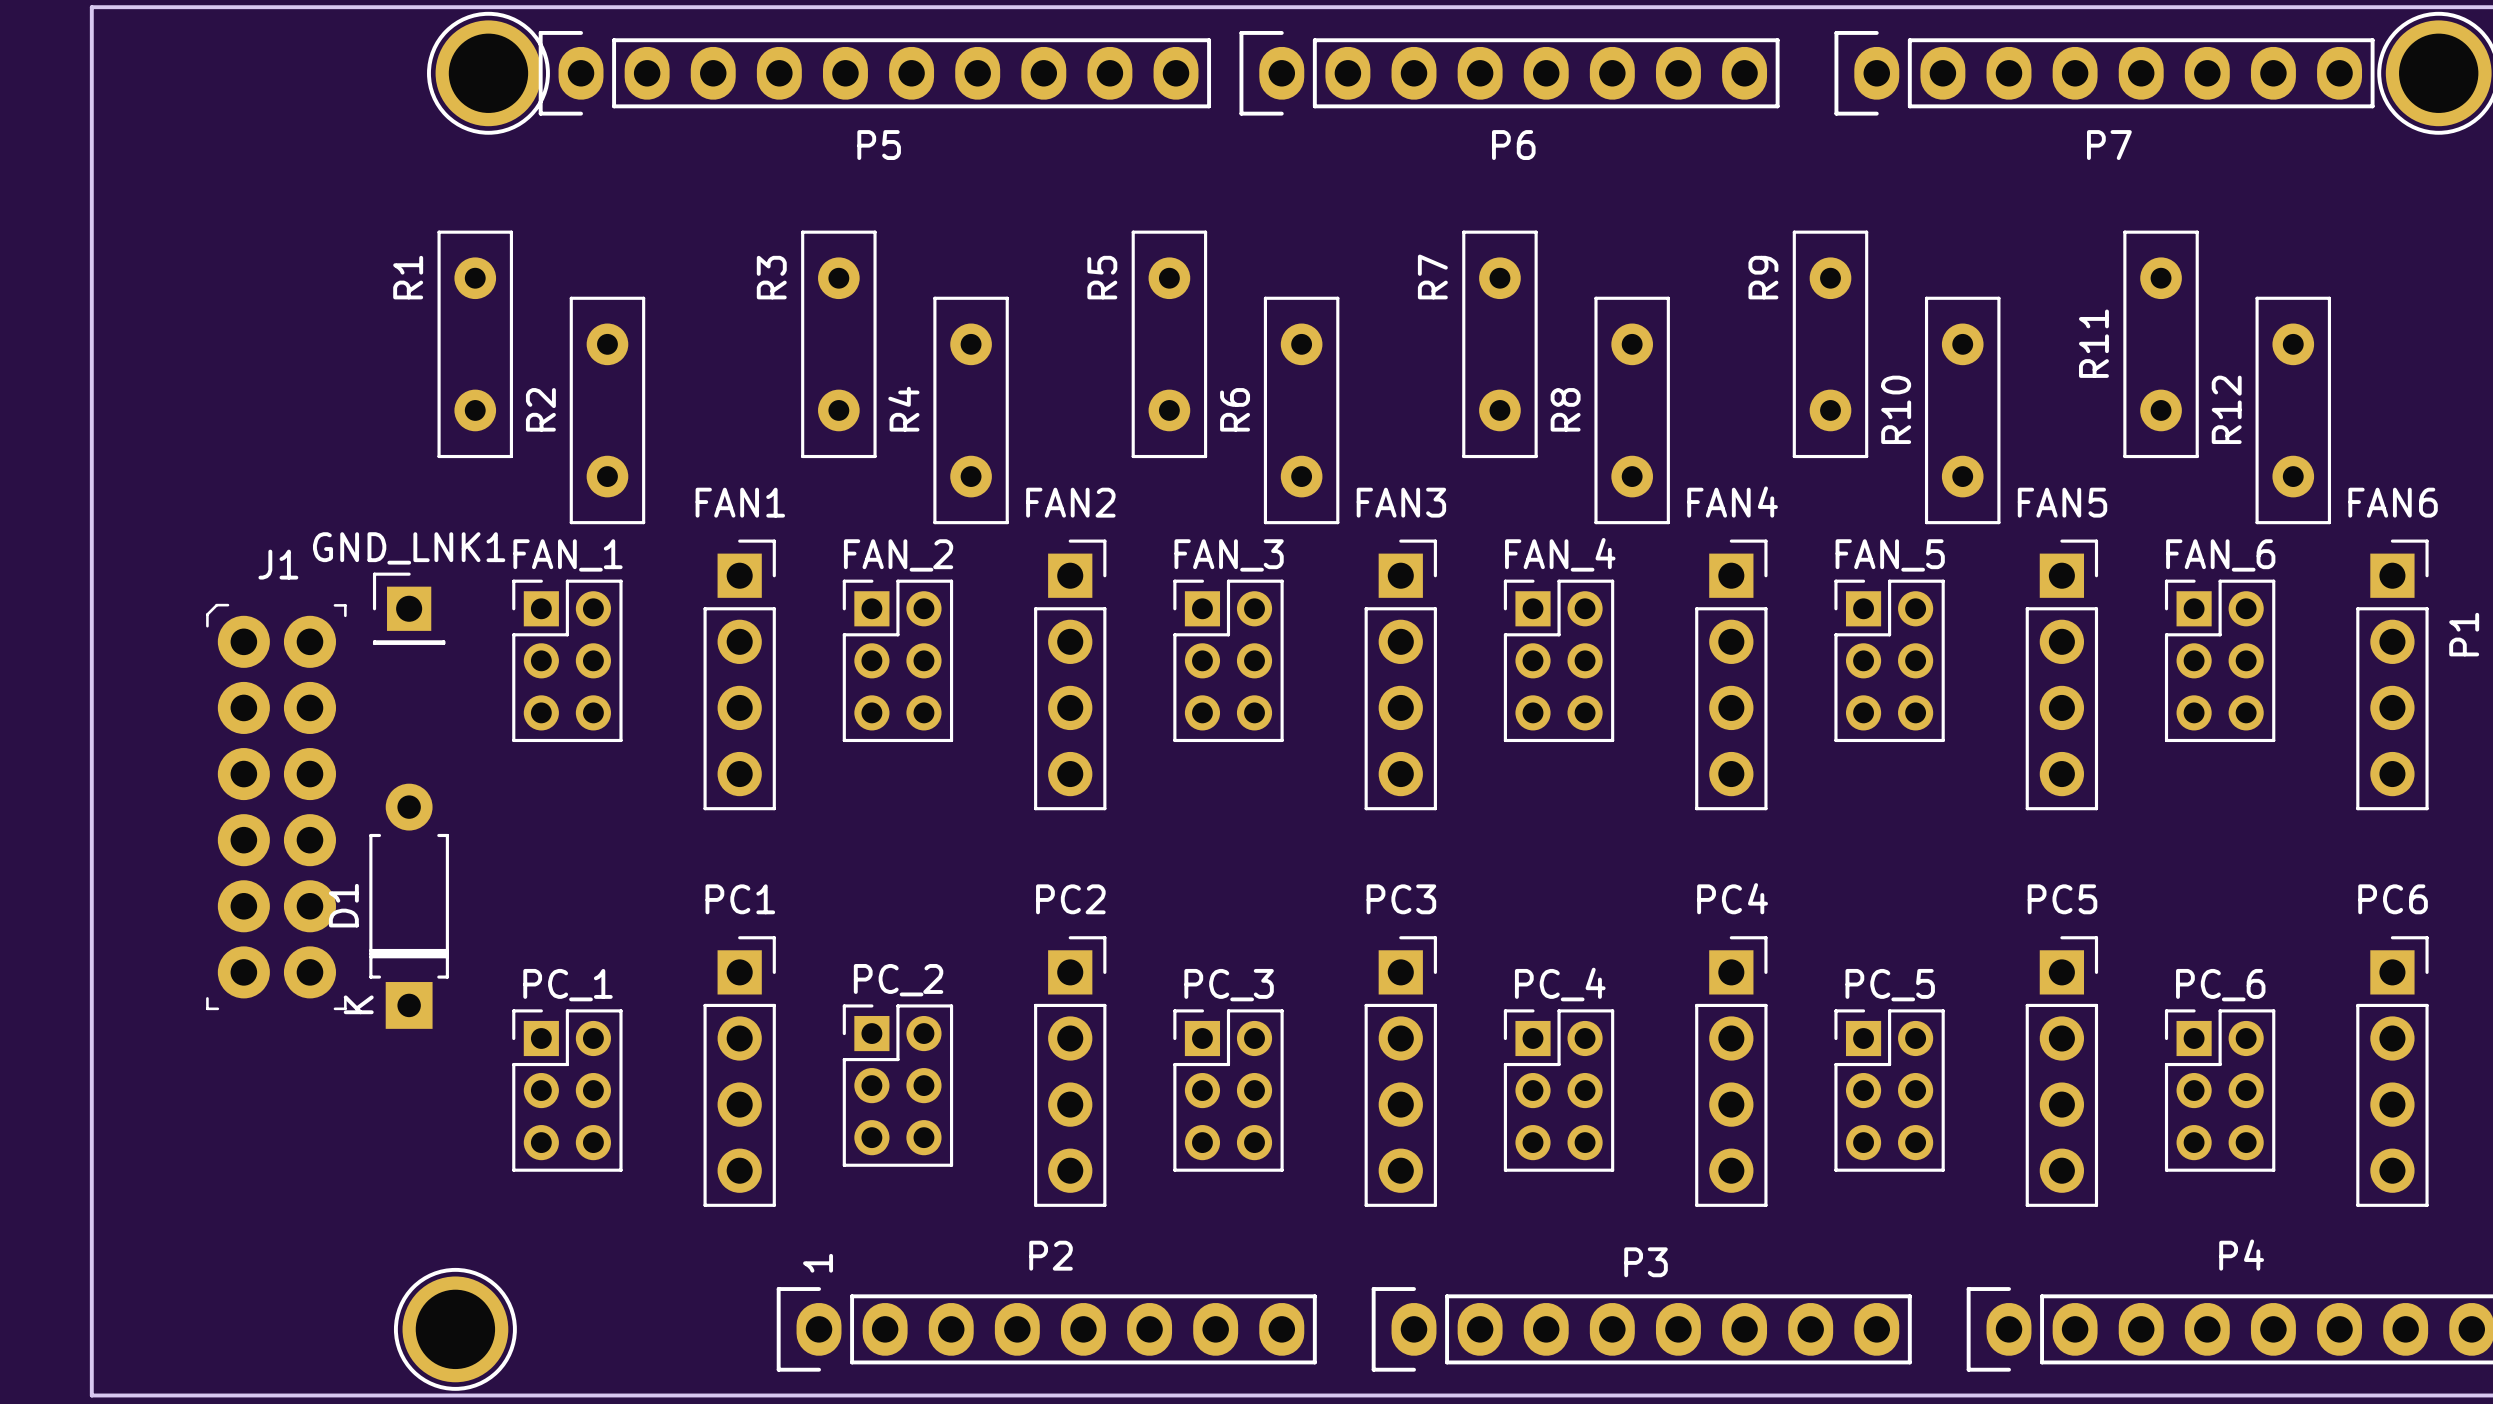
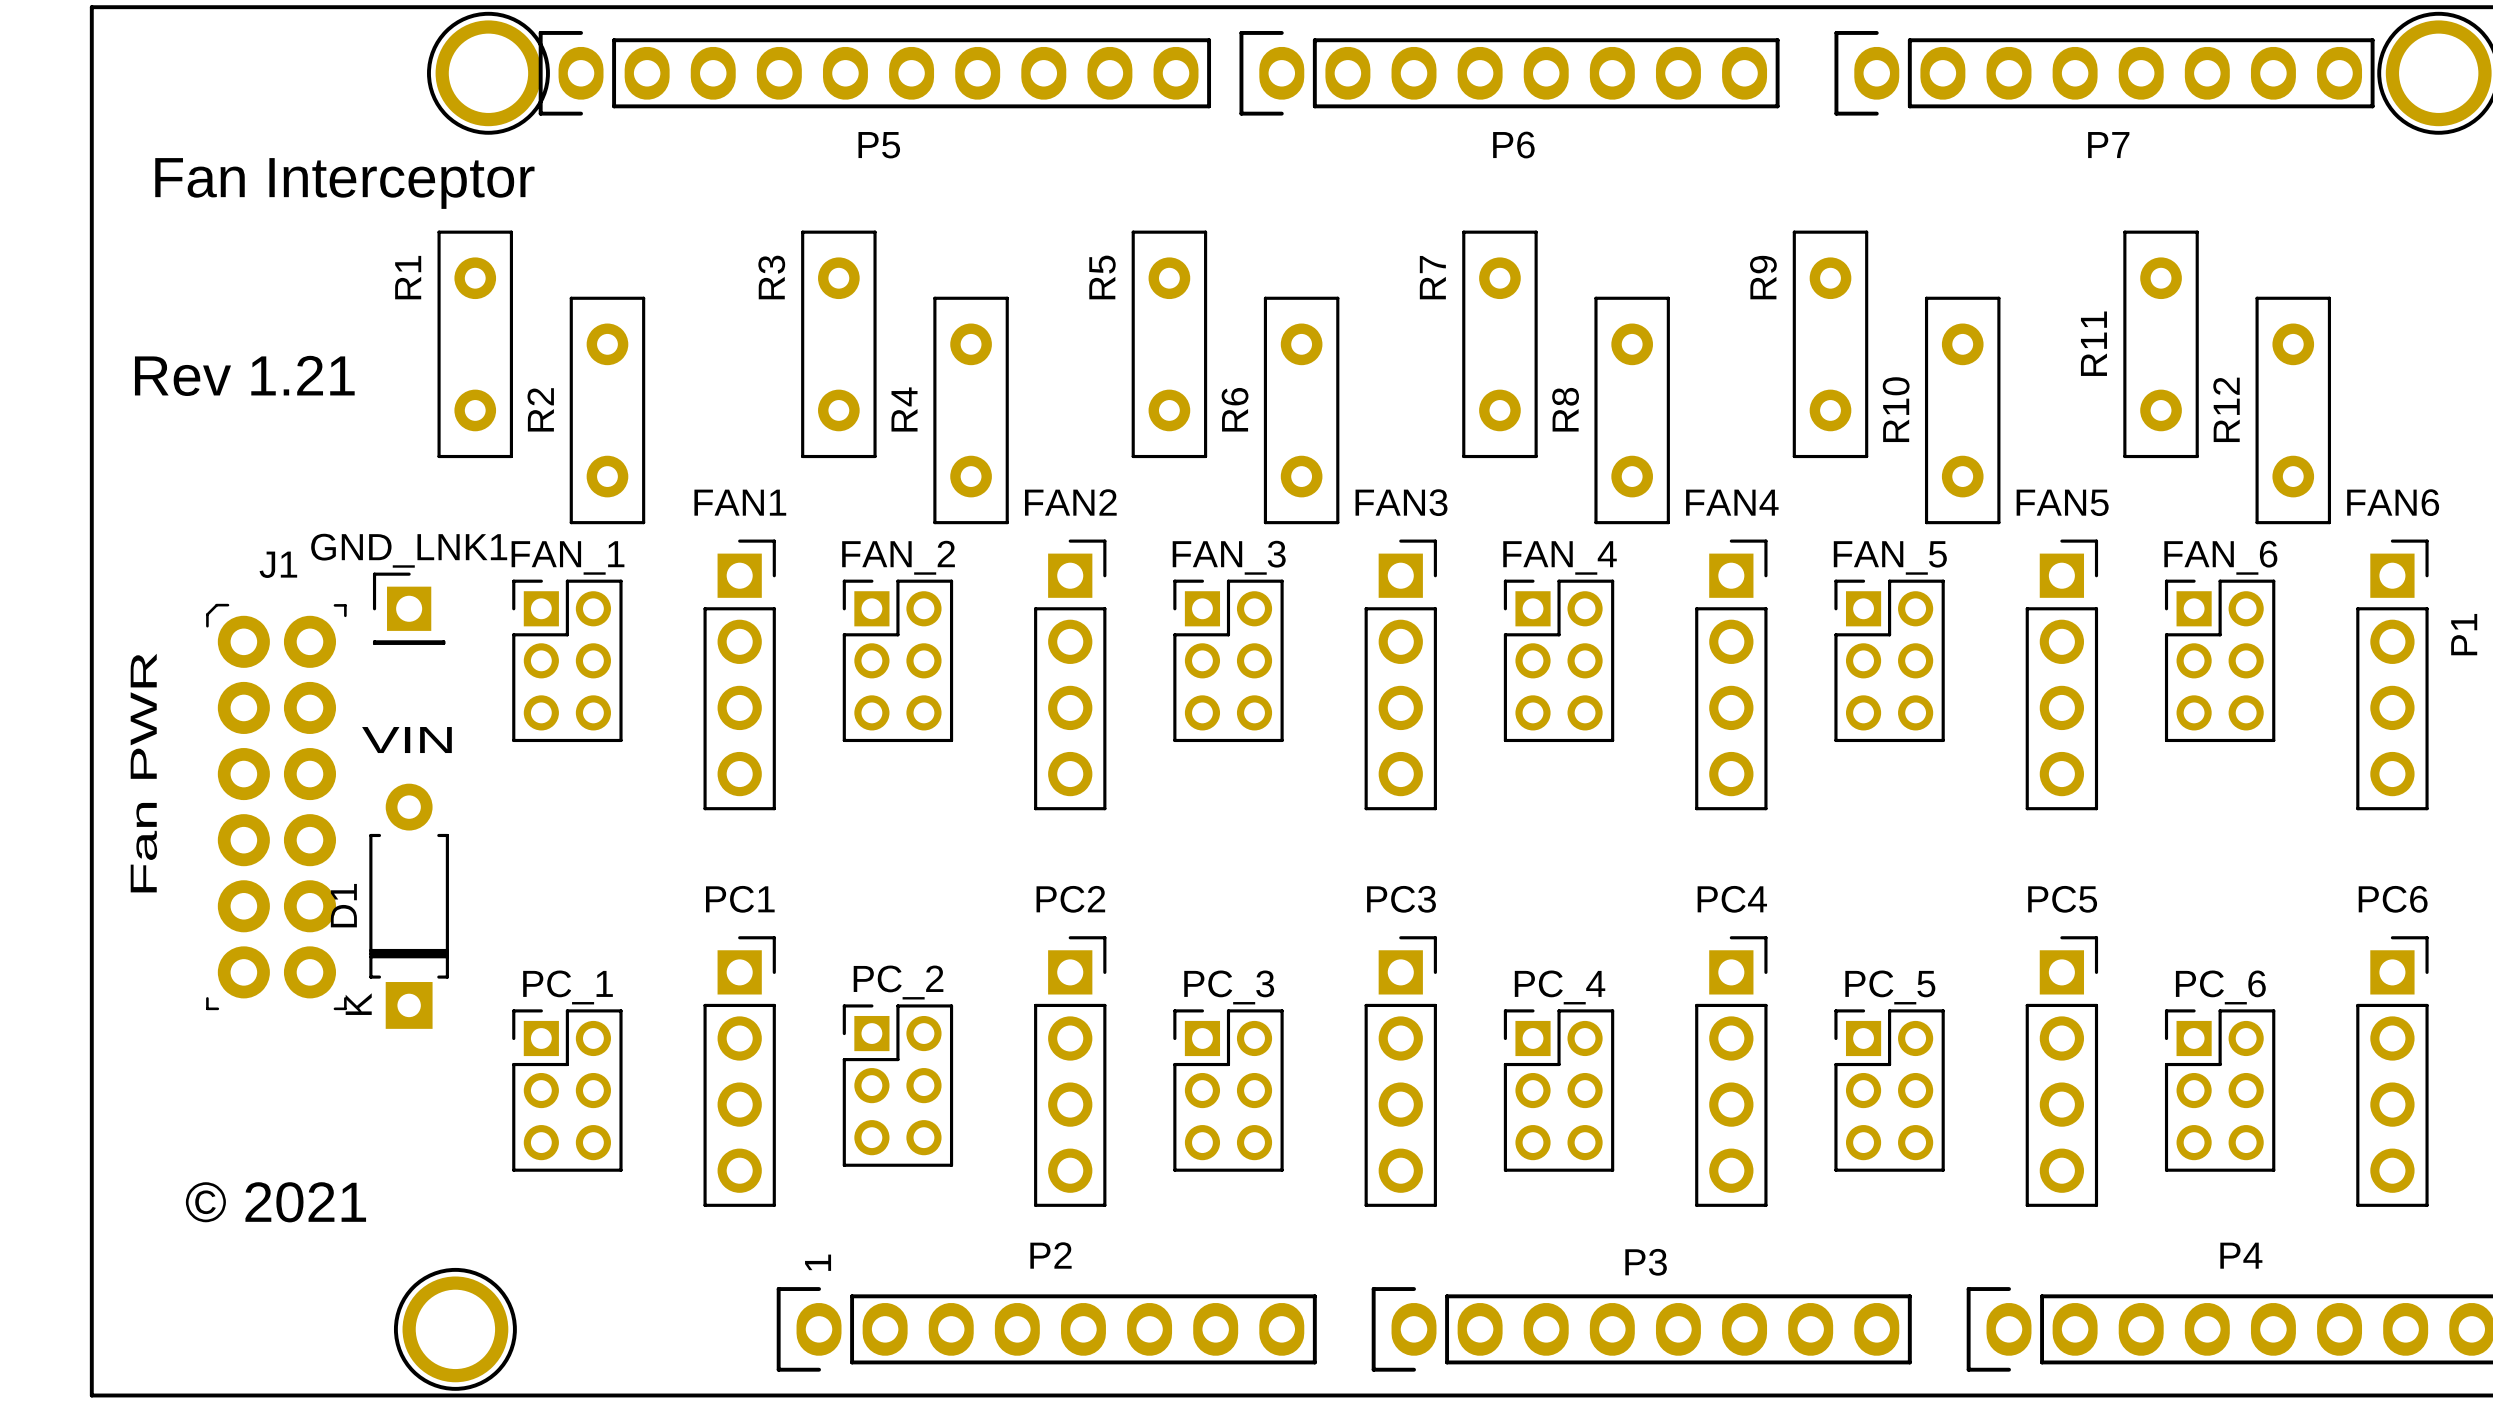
text: none -> Fan Interceptor (344, 183)
text: none -> Rev 1.21 (244, 375)
text: none -> VIN (406, 740)
text: none -> Fan PWR (143, 773)
text: none -> © 2021 (275, 1202)

